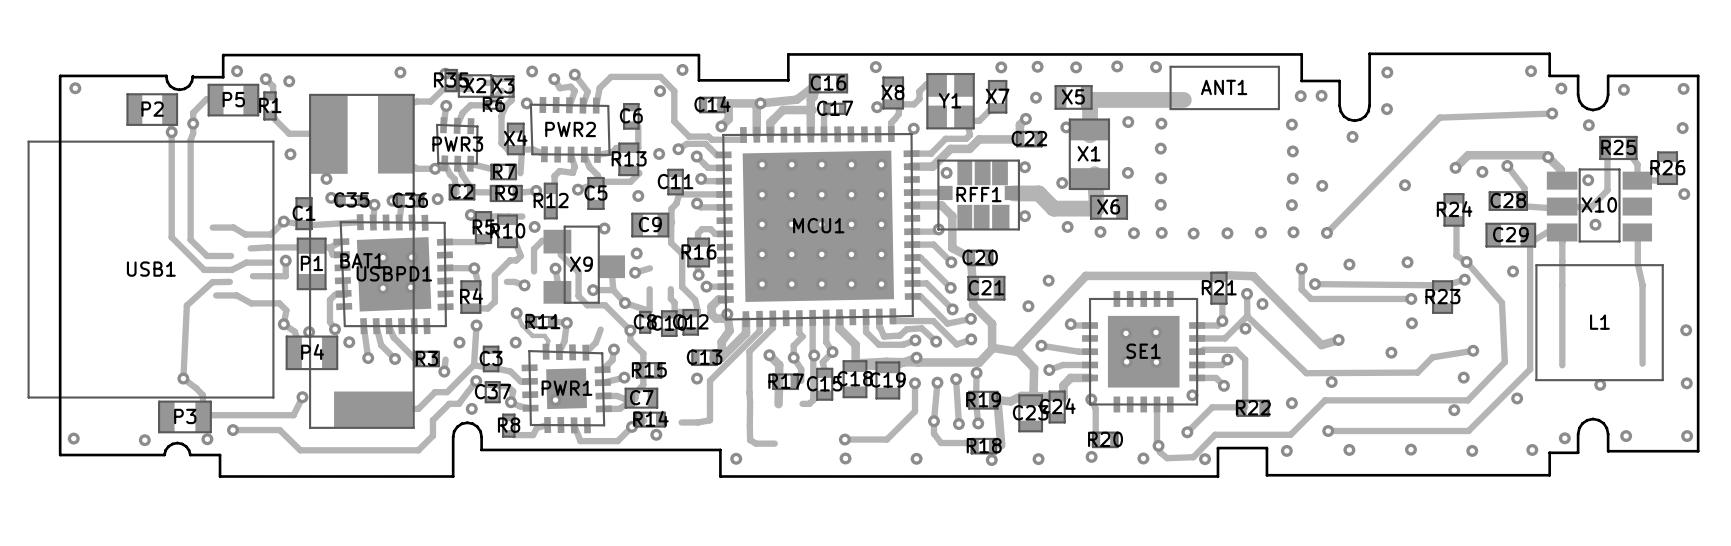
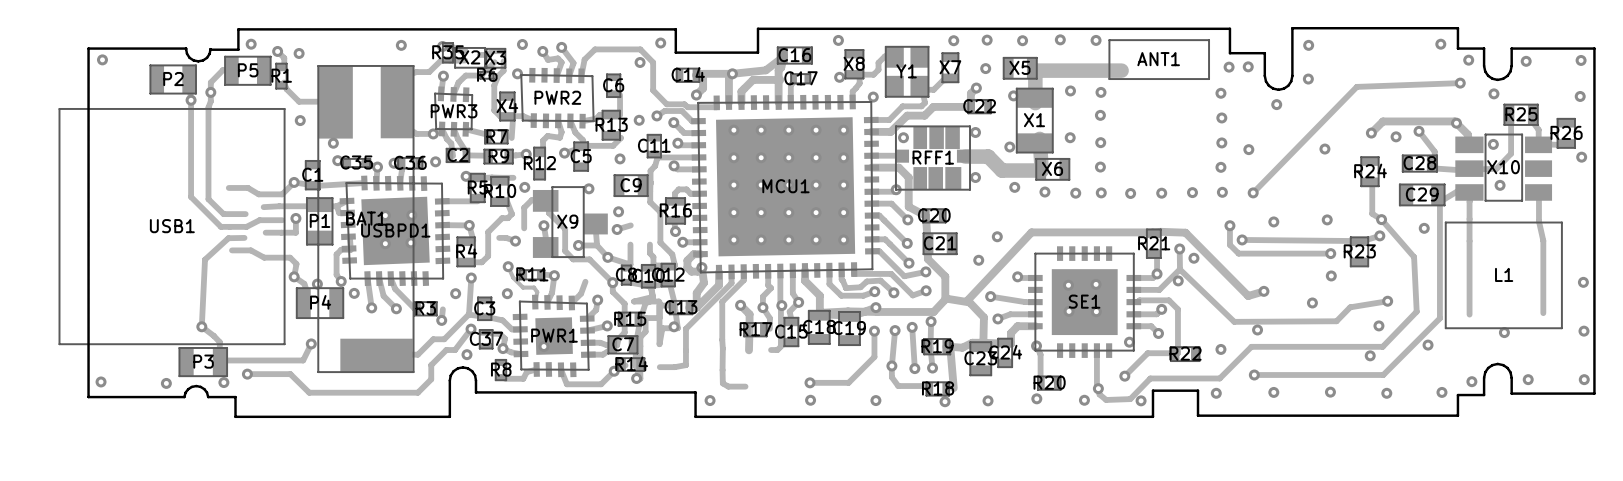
track: none -> (628, 282) (648, 285) (669, 284) (675, 305) (661, 305) (658, 301) (633, 301) (653, 296) (650, 286) (653, 300) (645, 303) (635, 345) (635, 365) (640, 378) (640, 337) (645, 331) (645, 318) (659, 318)
track: none -> (659, 305) (659, 344) (662, 328) (677, 328) (675, 309)

